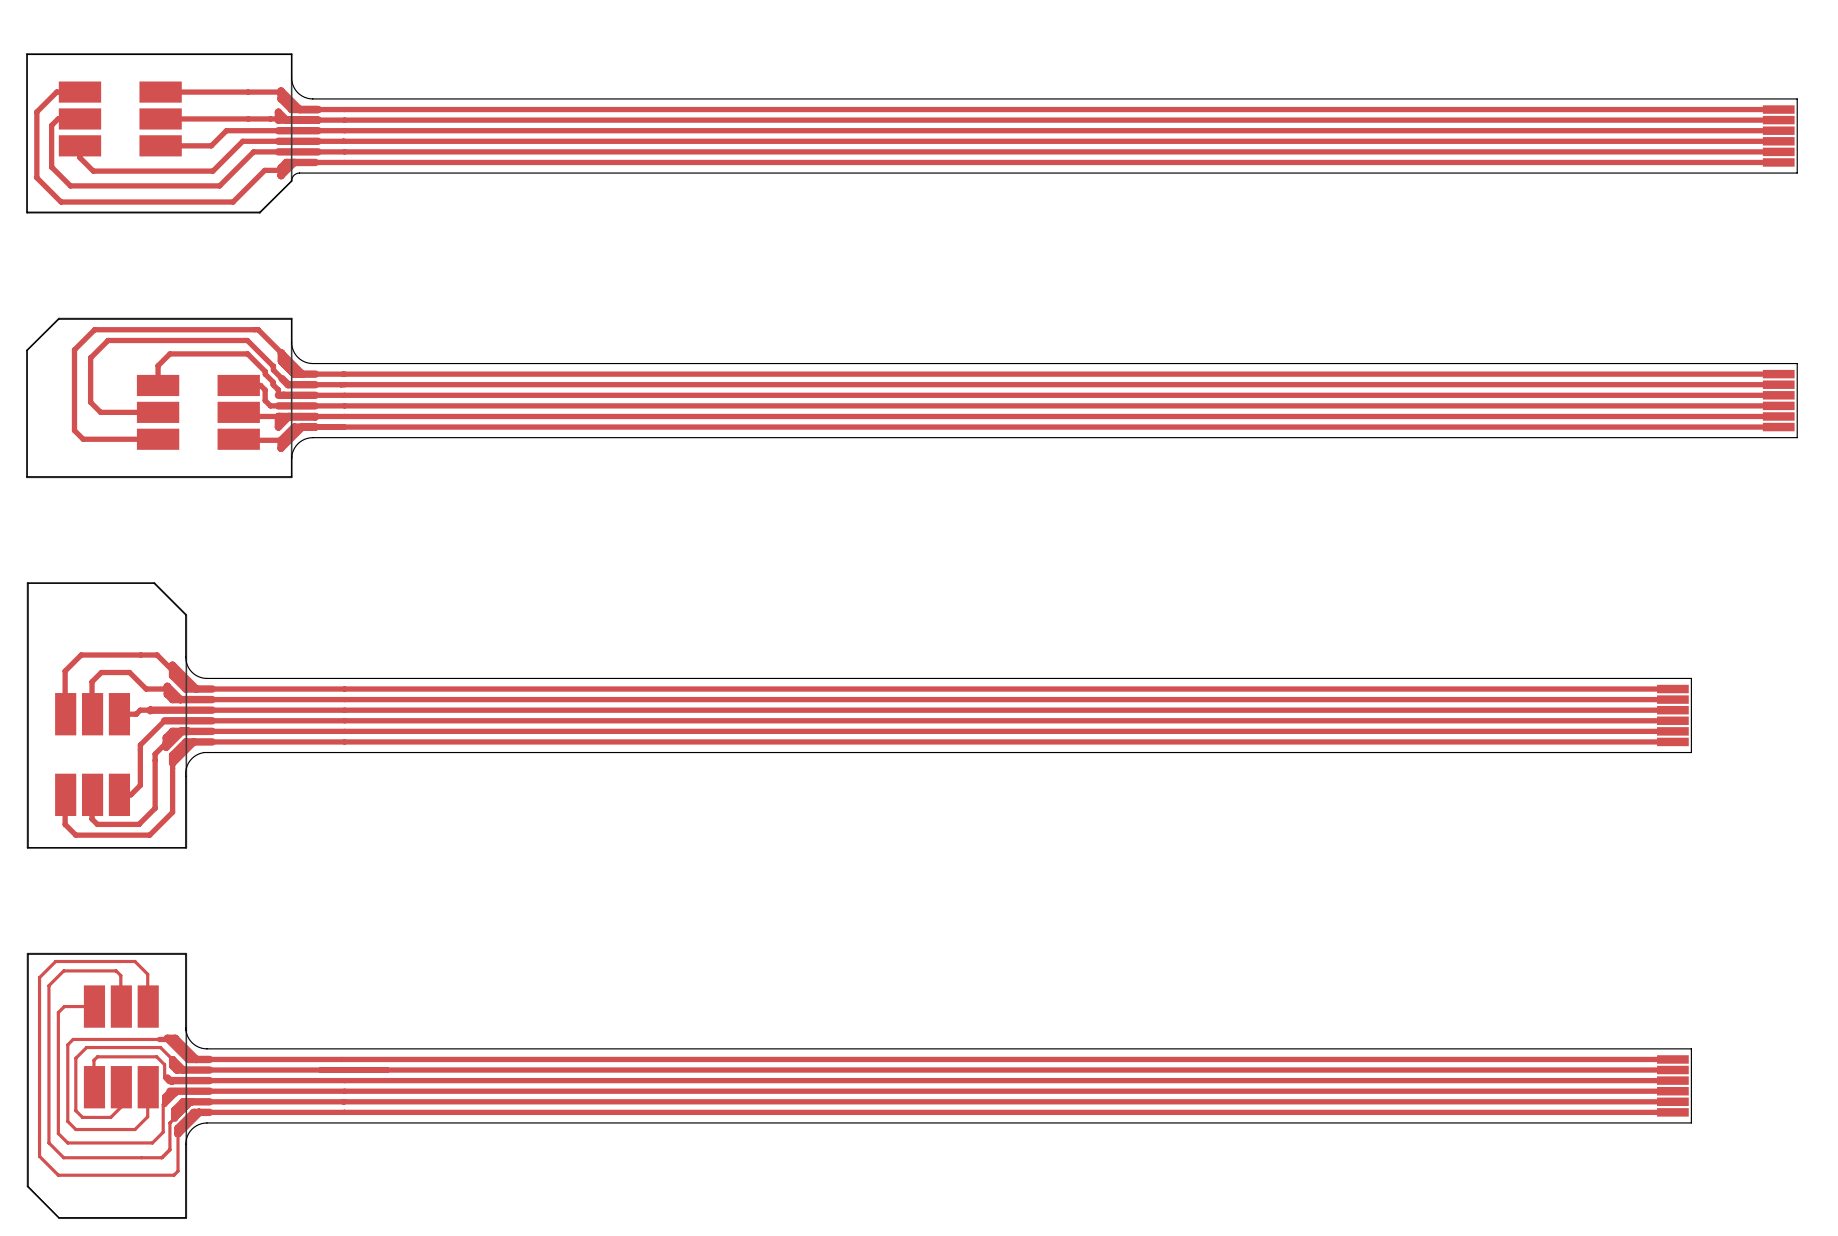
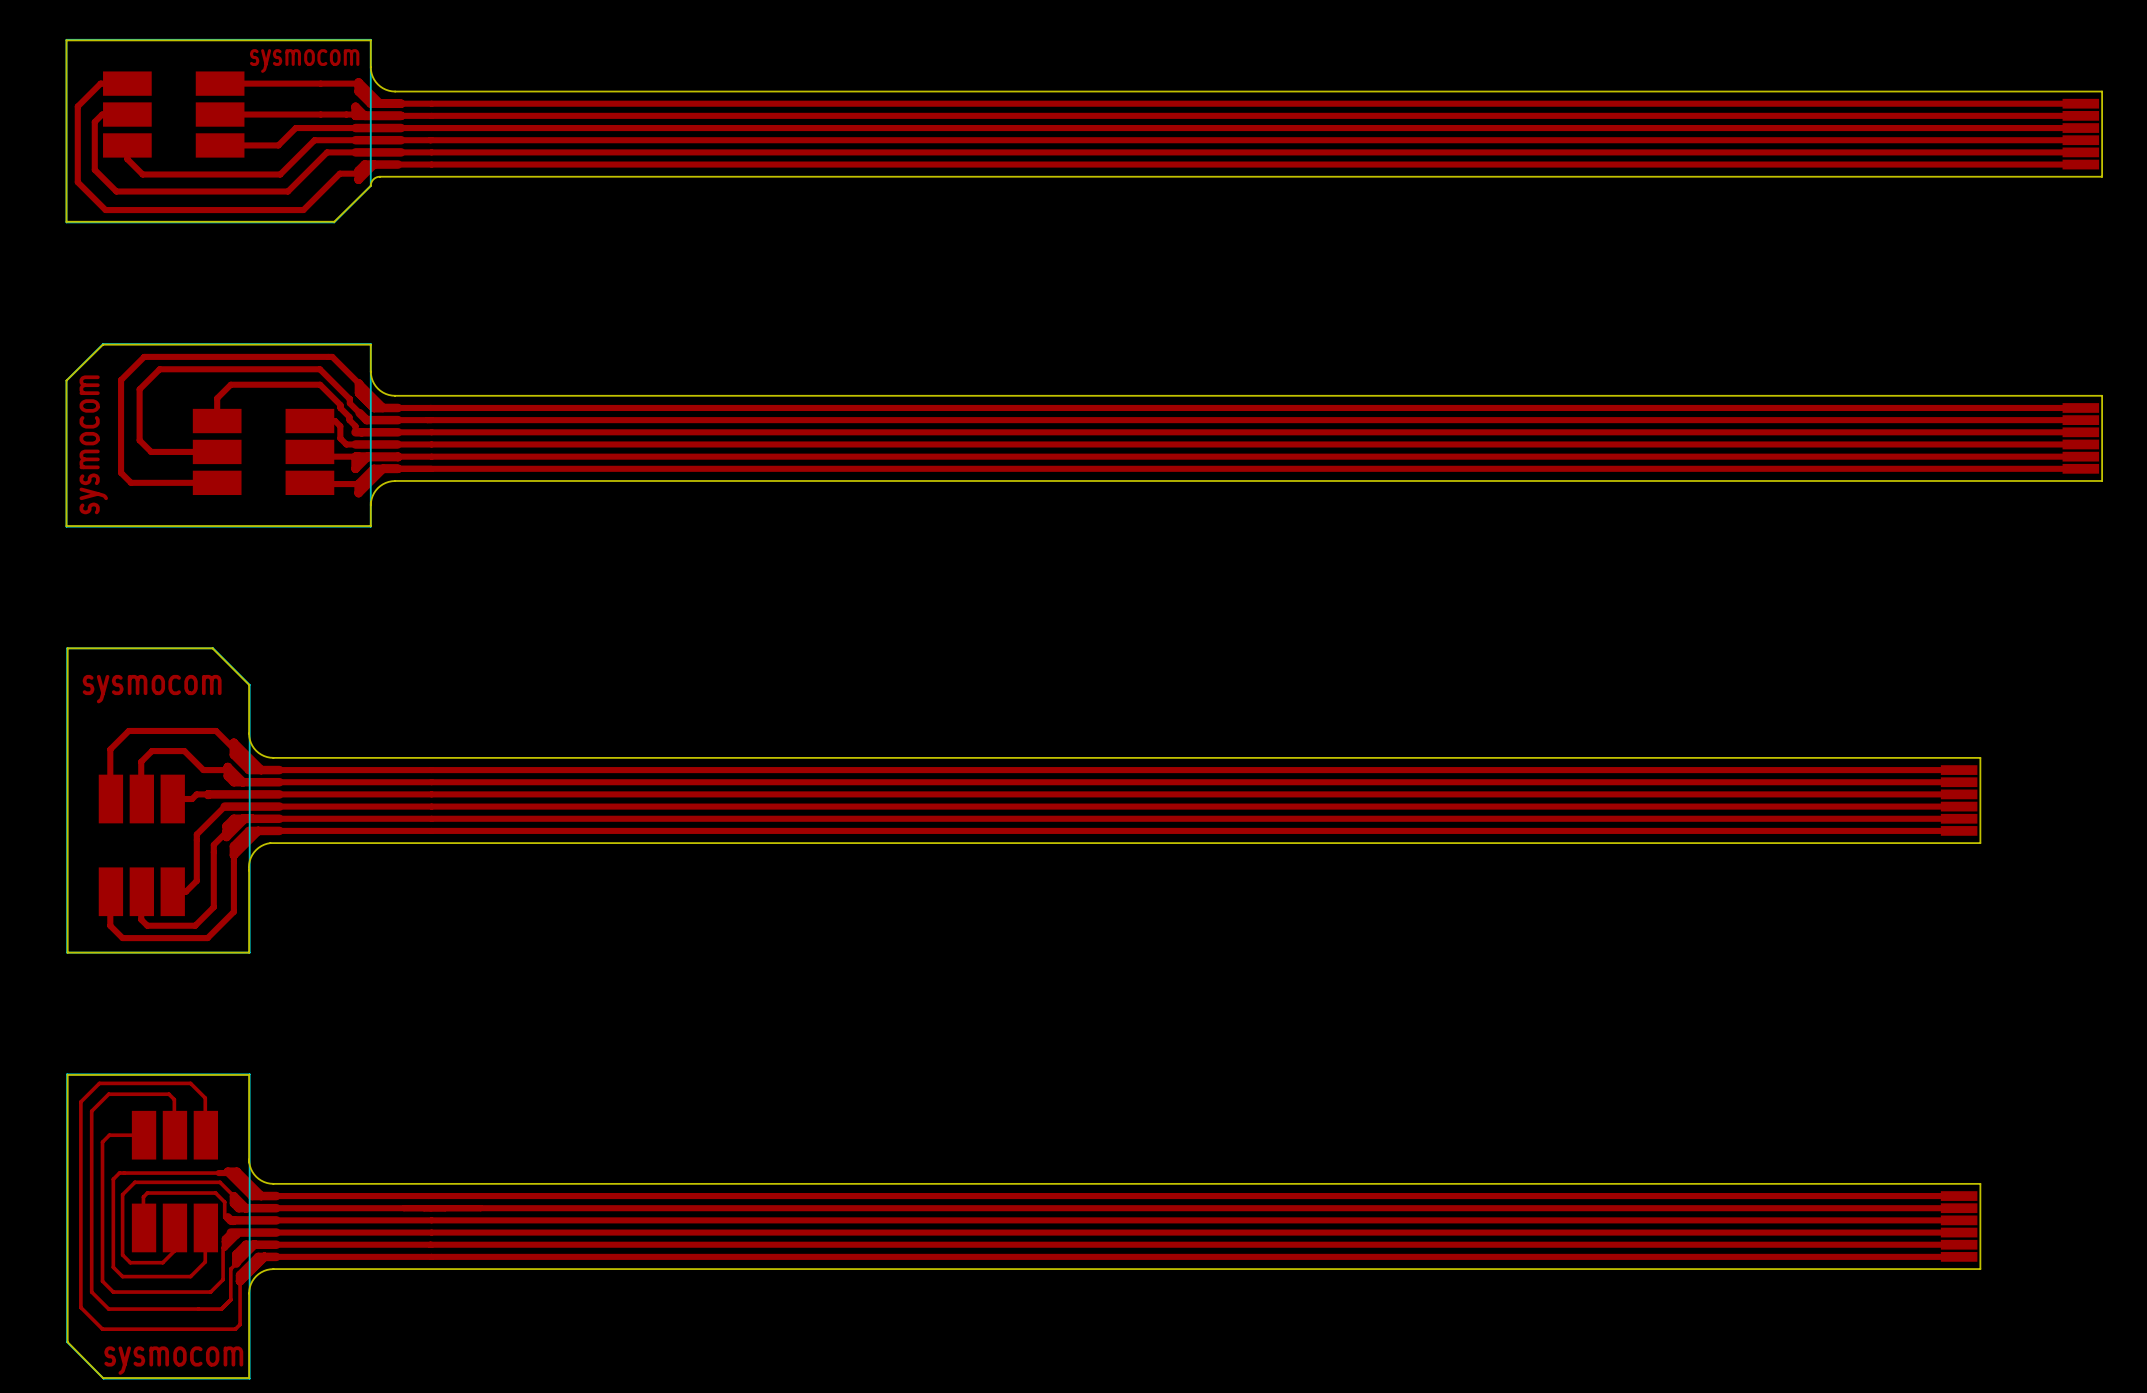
text: none -> sysmocom (304, 60)
text: none -> sysmocom (93, 444)
text: none -> sysmocom (152, 689)
text: none -> sysmocom (173, 1360)

